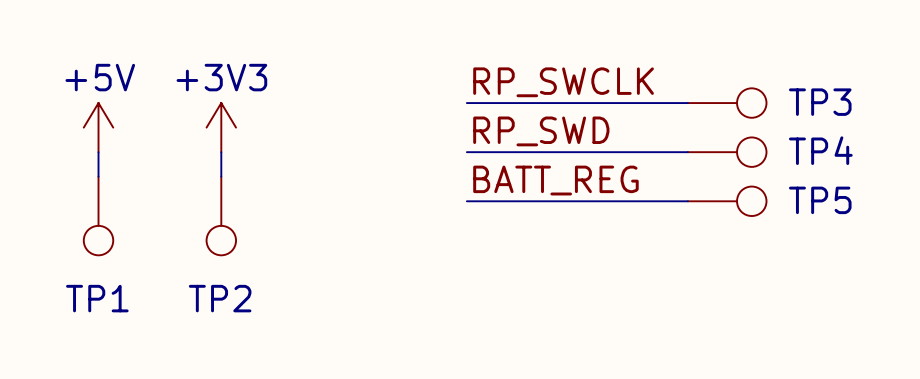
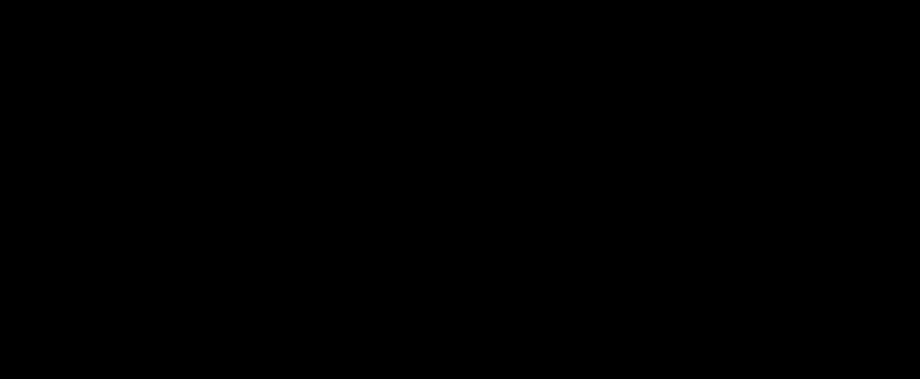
label: RP_SWCLK (563, 82) -> none
wire: (466, 103) (687, 103) -> none
TP3: (727, 103) -> none
power symbol: +5V (98, 127) -> none
power symbol: +3V3 (221, 127) -> none
label: RP_SWD (541, 131) -> none
wire: (98, 152) (98, 176) -> none
wire: (221, 152) (221, 176) -> none
wire: (466, 152) (687, 152) -> none
TP4: (727, 152) -> none
label: BATT_REG (555, 180) -> none
wire: (466, 201) (687, 201) -> none
TP5: (727, 201) -> none
TP1: (98, 216) -> none
TP2: (221, 216) -> none

